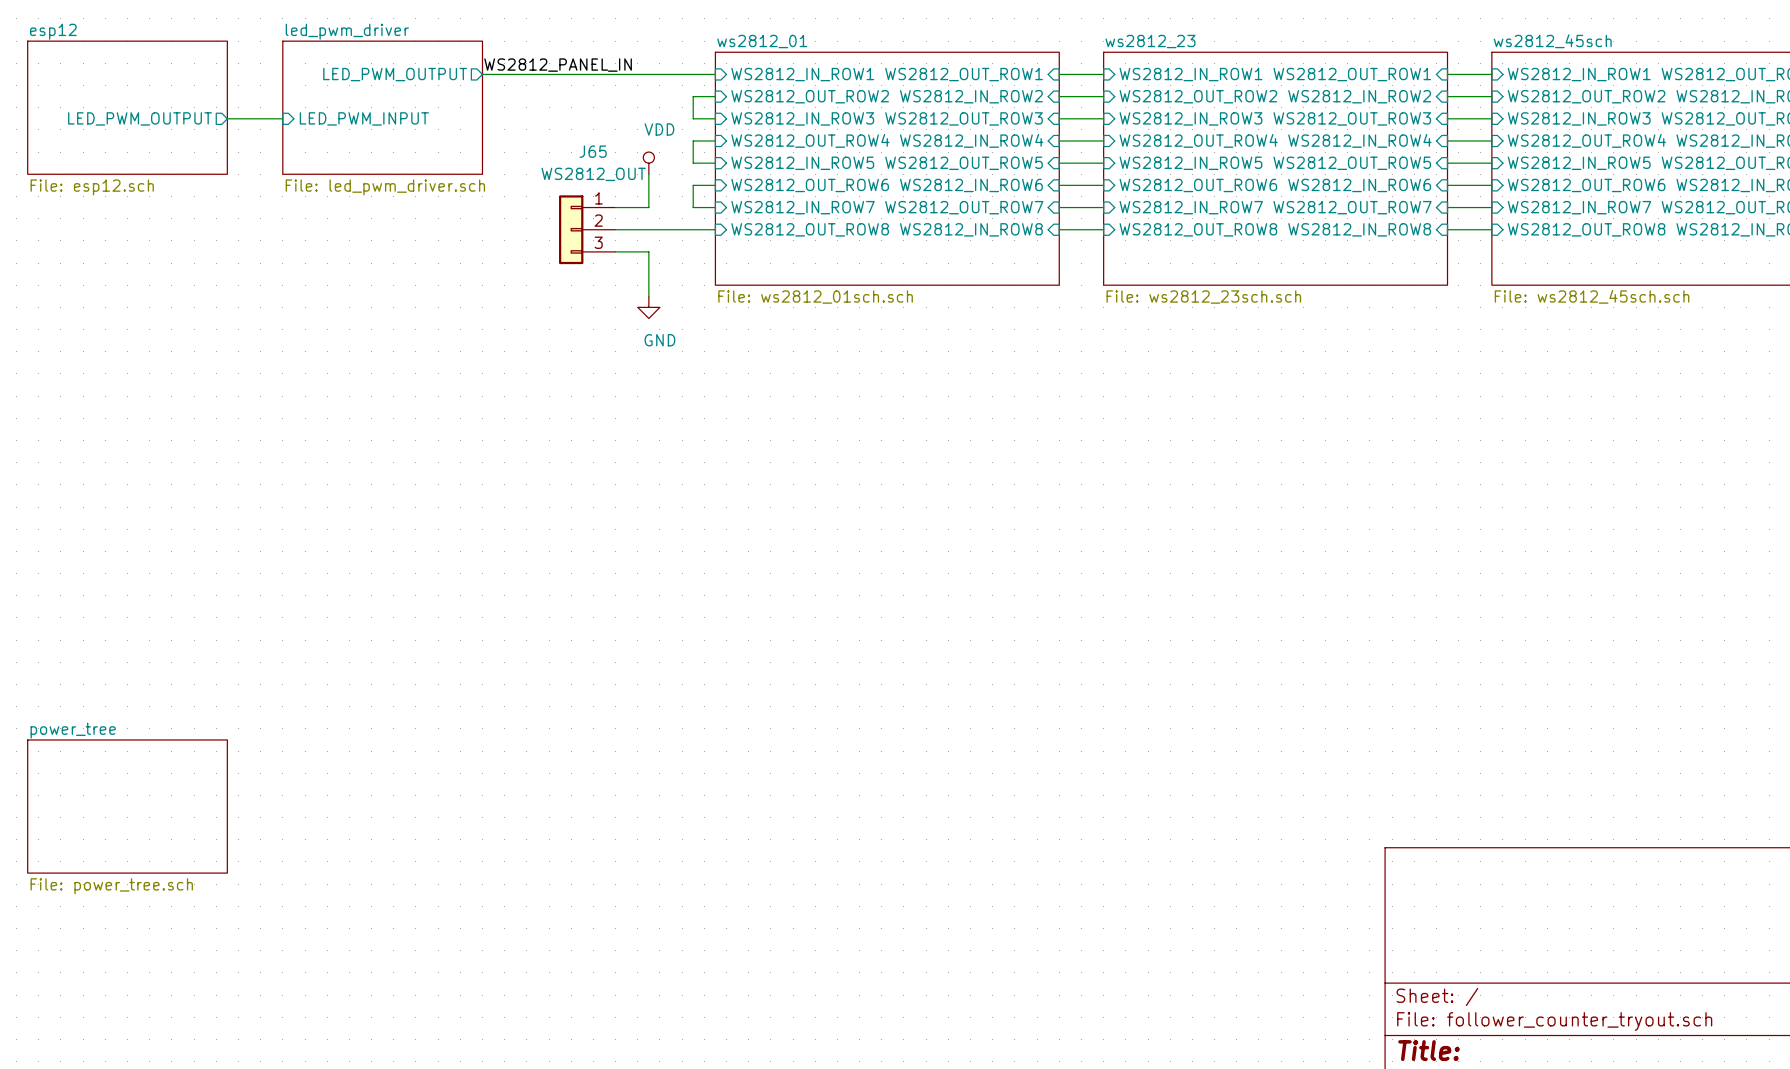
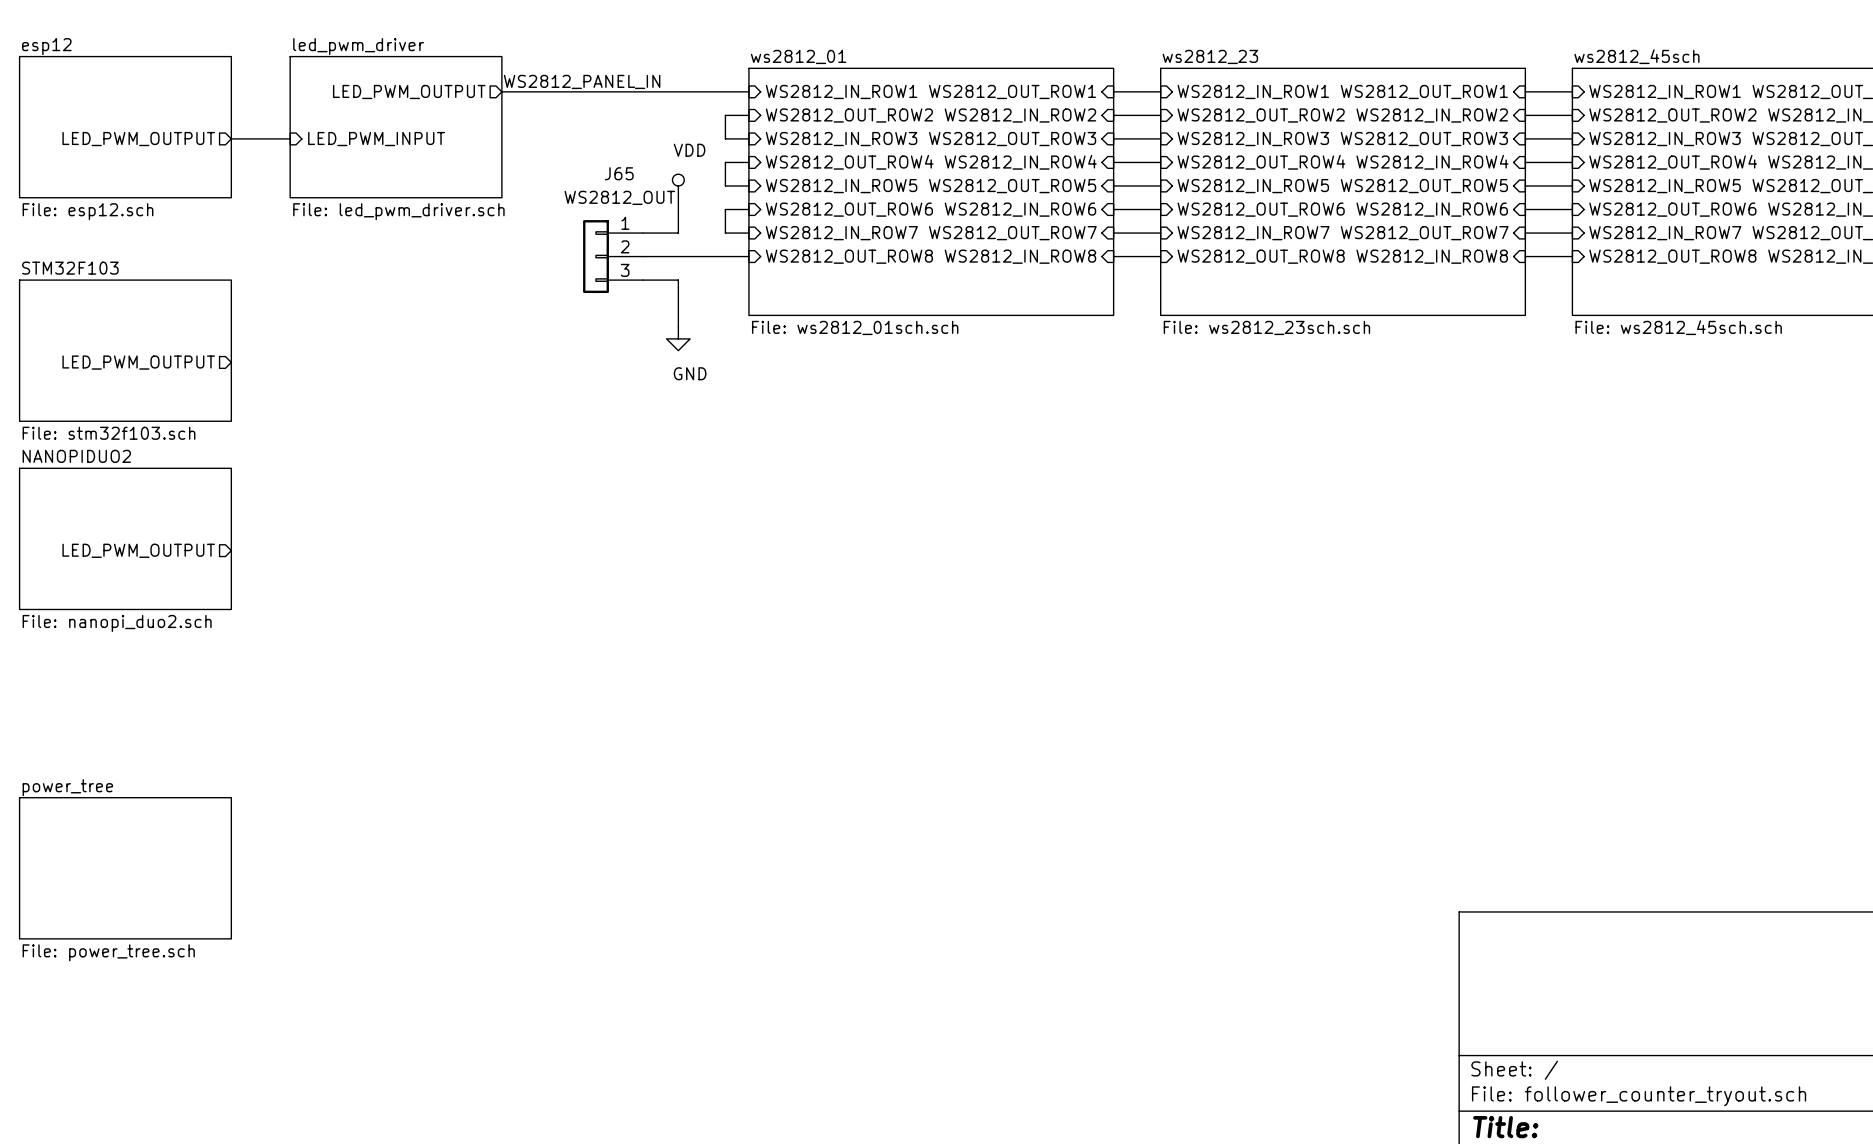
sheet STM32F103: none -> File: stm32f103.sch (125, 350)
sheet pin: none -> LED_PWM_OUTPUT (138, 362)
sheet NANOPIDUO2: none -> File: nanopi_duo2.sch (125, 538)
sheet pin: none -> LED_PWM_OUTPUT (138, 550)

